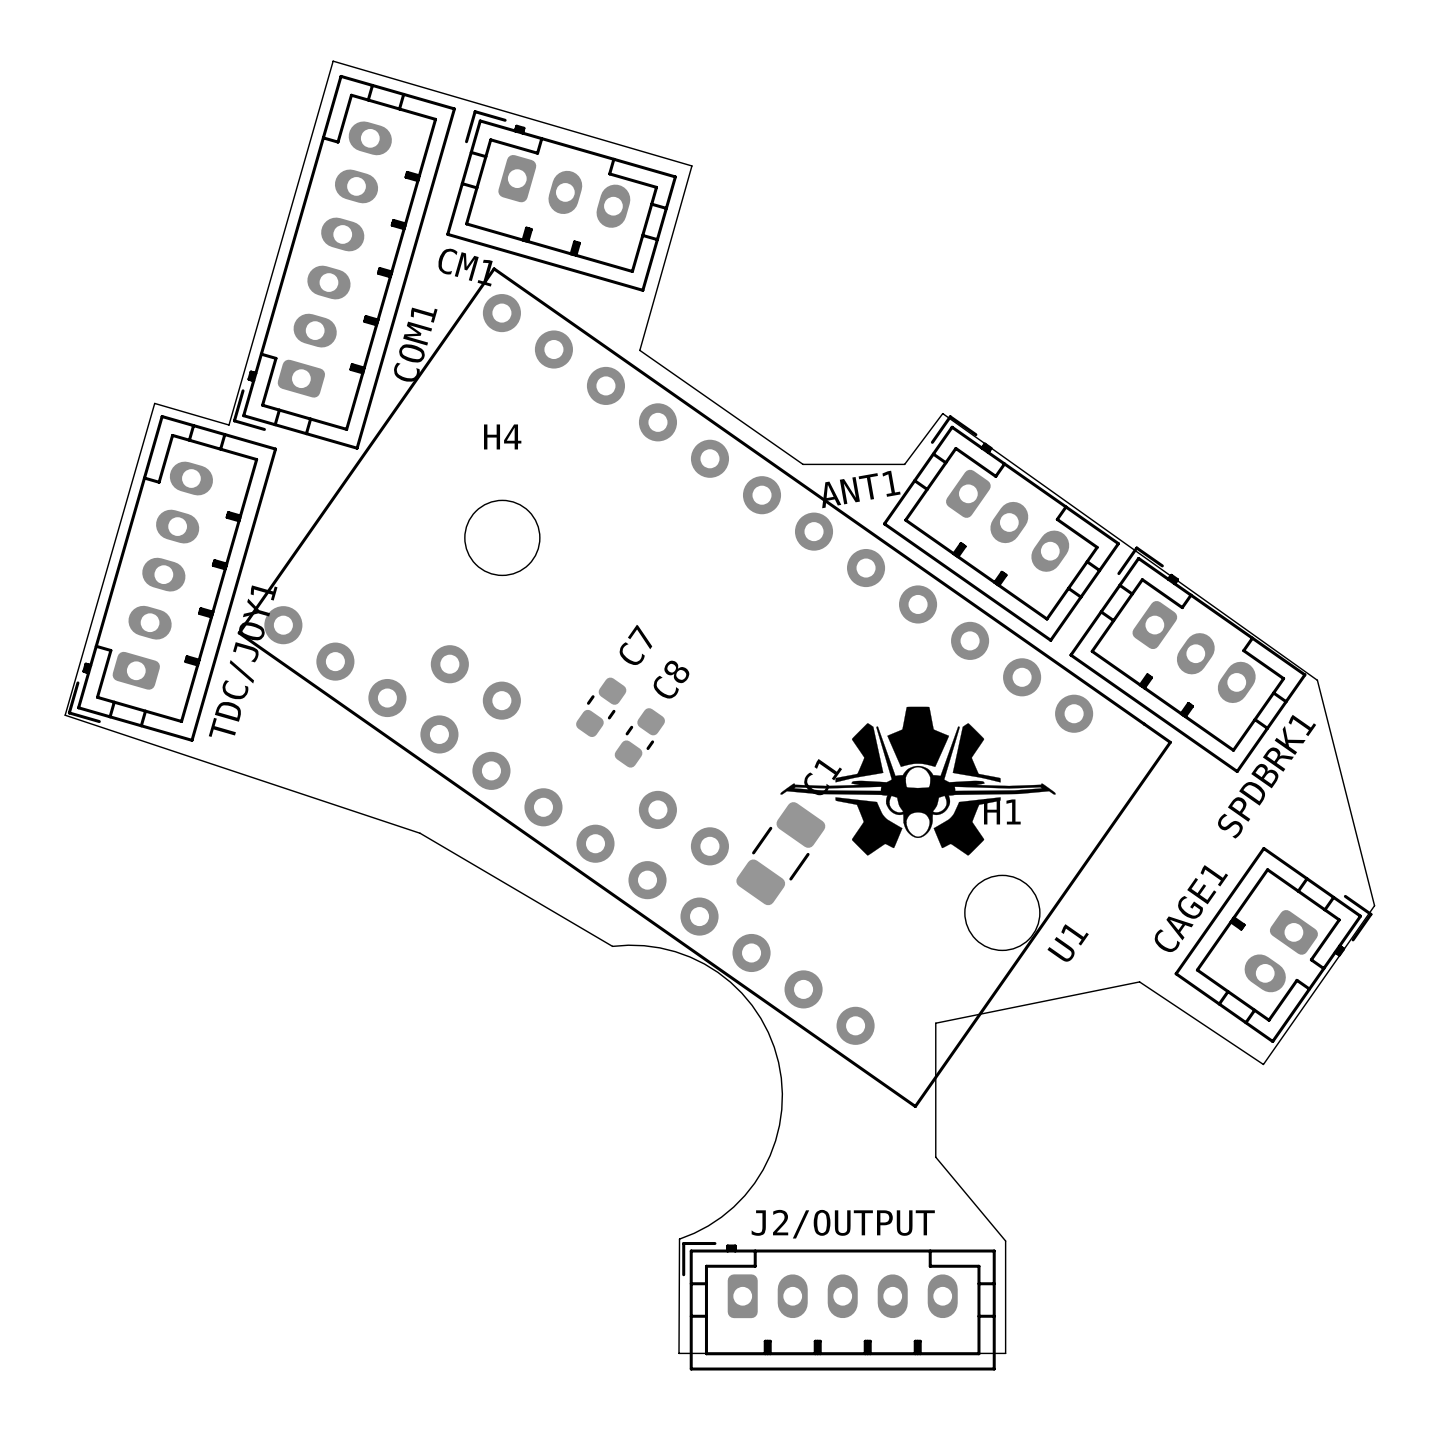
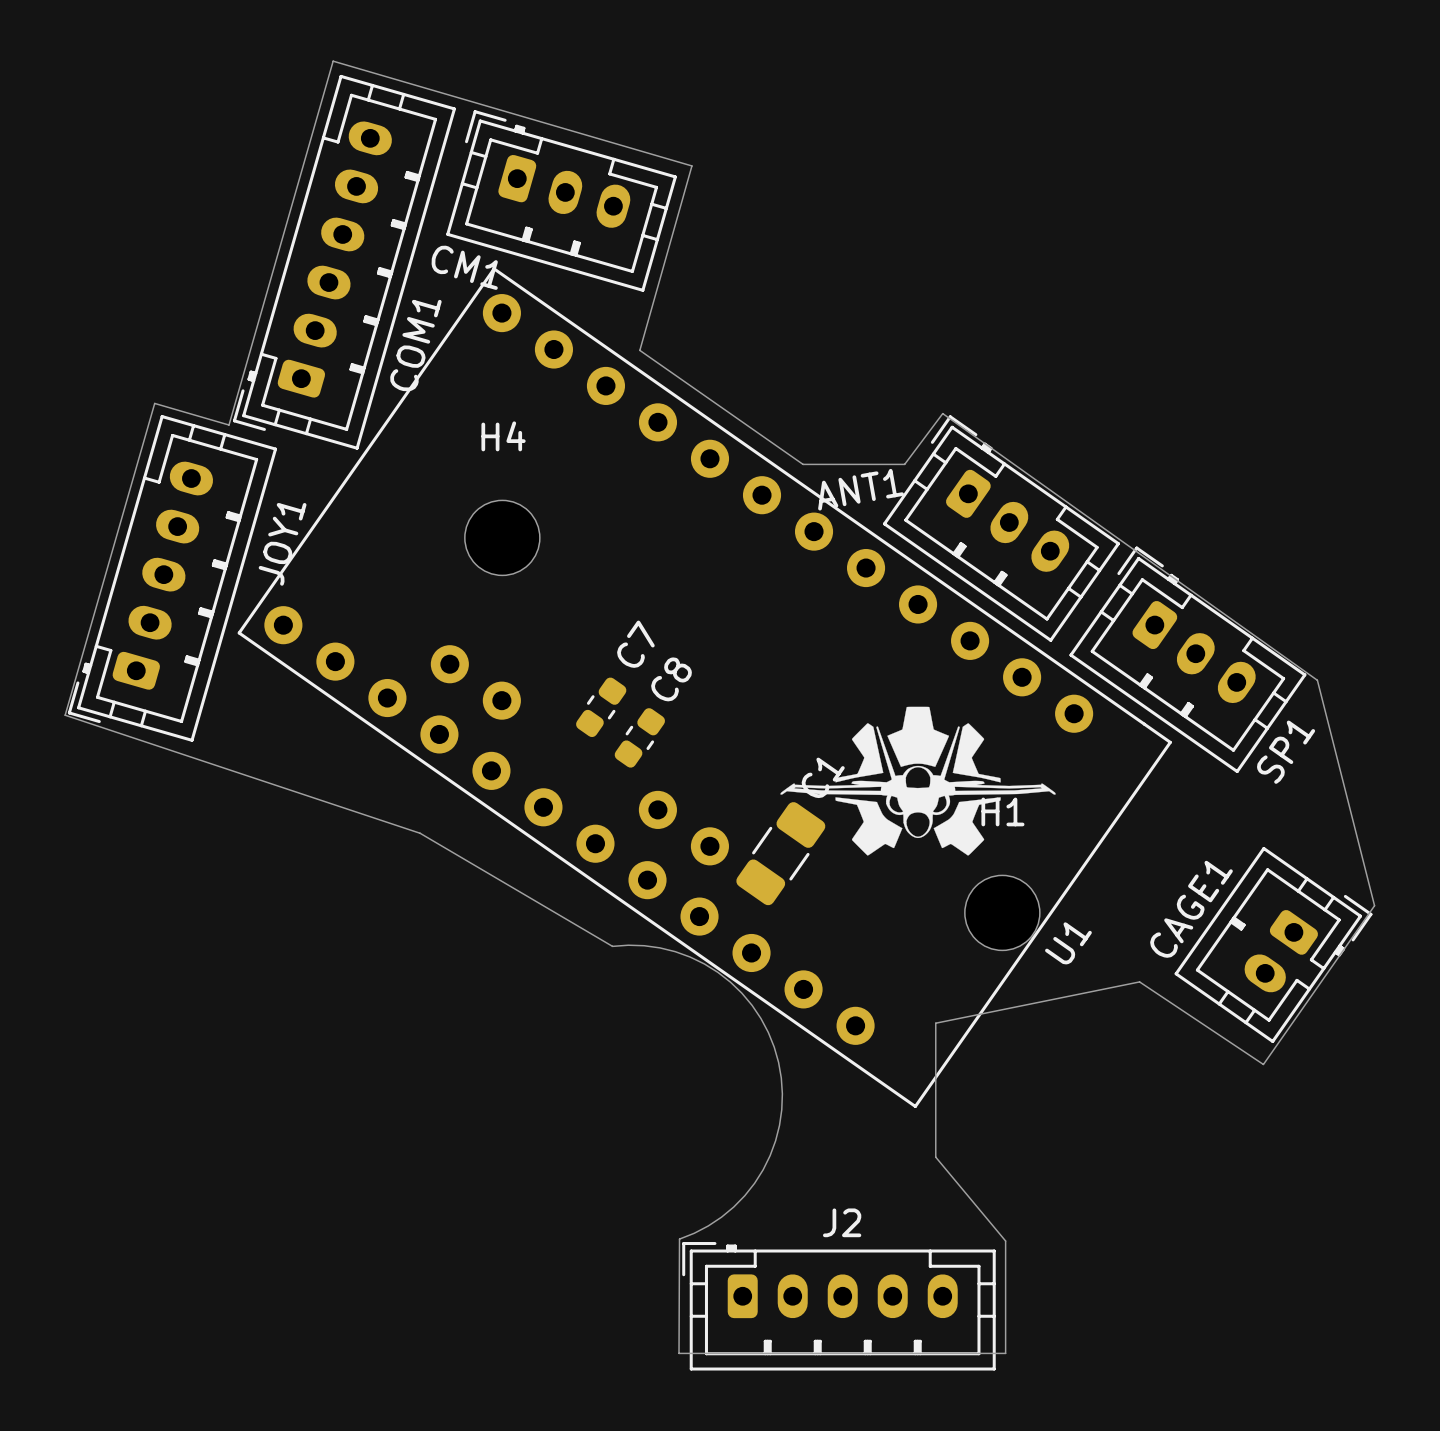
TDC/JOY1 name: TDC/JOY1 (243, 661) -> JOY1 (282, 544)
SPDBRK1 name: SPDBRK1 (1266, 776) -> SP1 (1286, 752)
J2/OUTPUT name: J2/OUTPUT (843, 1224) -> J2 (842, 1222)

